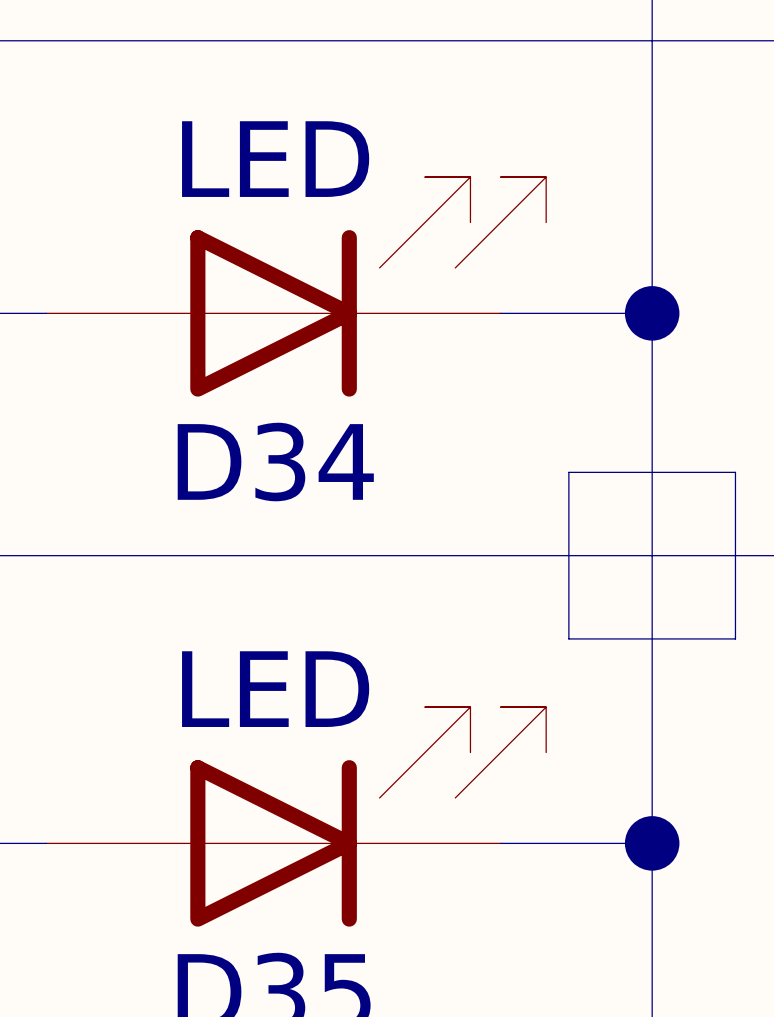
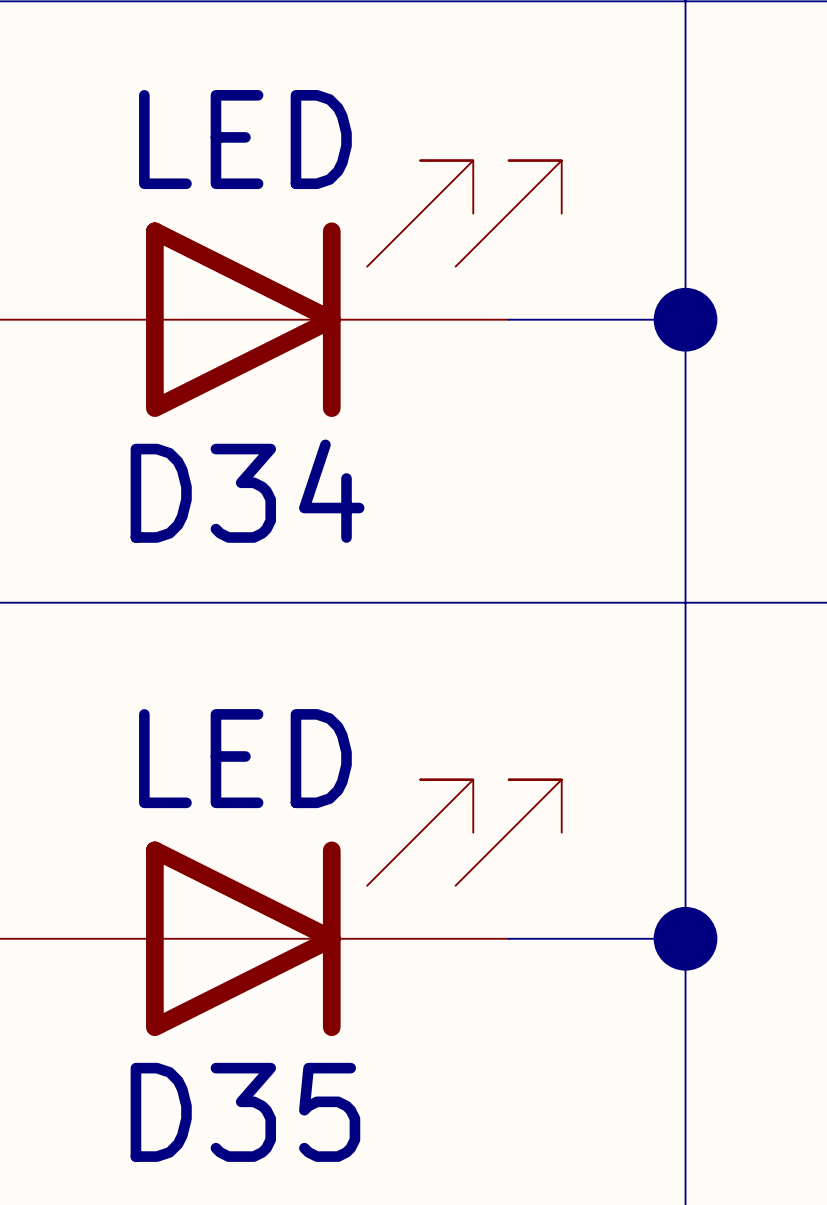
line: (568, 472) (735, 472) (735, 638) (568, 638) (568, 472) -> none

